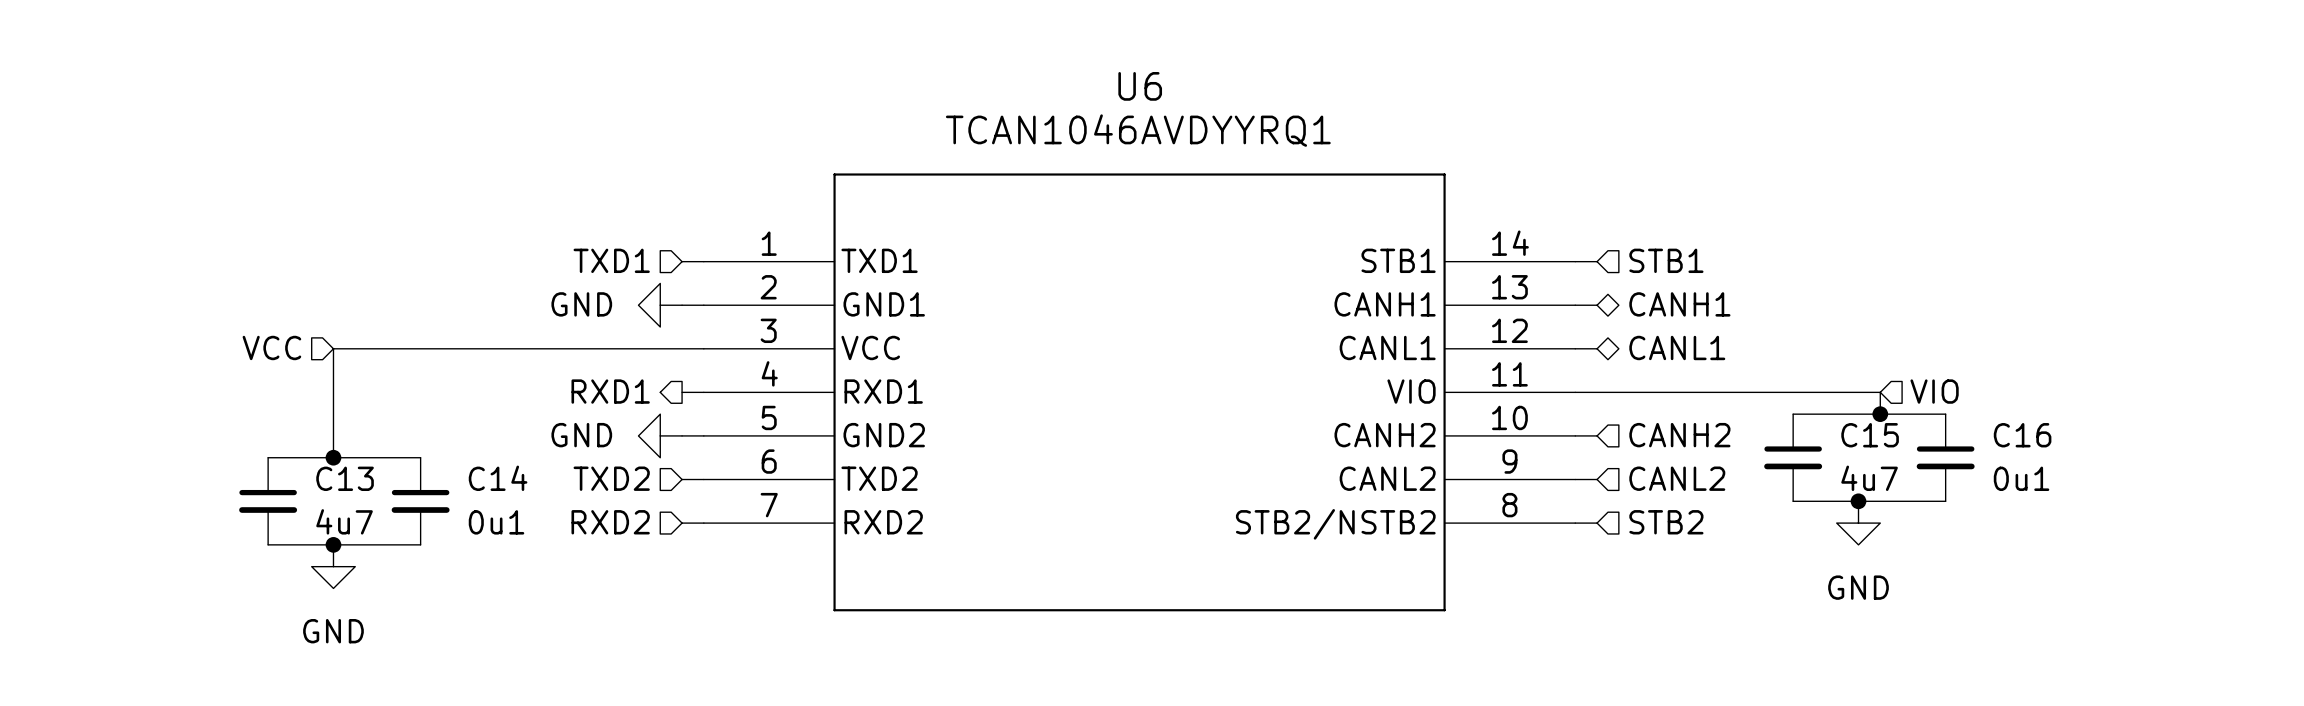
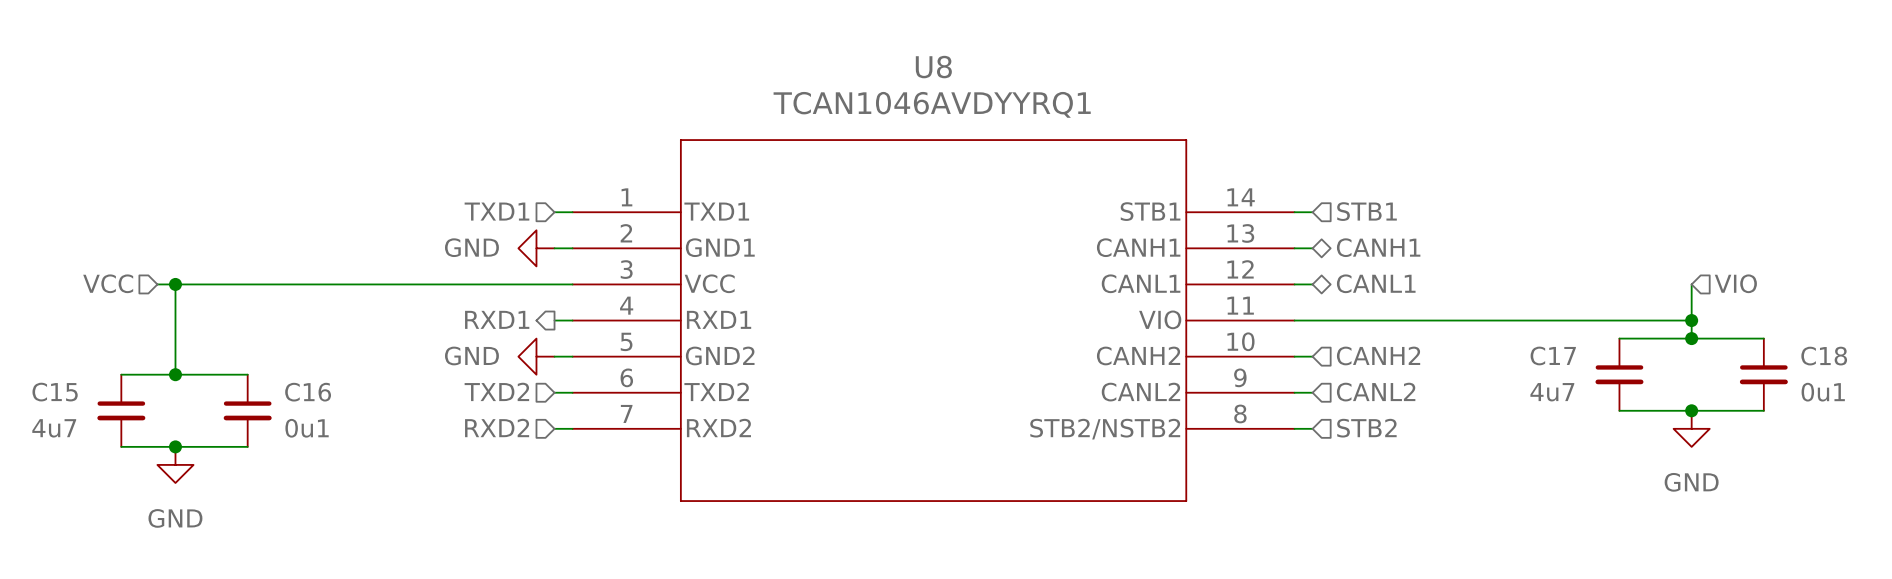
U6 name: U6 (1140, 86) -> U8 (933, 67)
hierarchical label position: VCC (271, 347) -> VCC (108, 283)
wire: none -> (175, 284) (175, 374)
junction: none -> (175, 284)
wire: (333, 348) (333, 457) -> (265, 284) (157, 284)
wire: none -> (1691, 284) (1691, 338)
hierarchical label position: VIO (1934, 391) -> VIO (1735, 283)
wire: (1880, 392) (1880, 414) -> (1547, 320) (1691, 320)
junction: none -> (1691, 320)
wire: (1793, 414) (1945, 414) -> none
junction: (1880, 414) -> none
wire: none -> (1619, 338) (1763, 338)
junction: none -> (1691, 338)
C15 name position: C15 (1870, 435) -> C15 (55, 392)
junction: none -> (175, 374)
wire: (311, 457) (420, 457) -> (121, 374) (211, 374)
junction: (333, 457) -> none
C15 position: (1793, 457) -> (121, 410)
C16 position: (1945, 457) -> (247, 410)
C17: none -> 4u7 (1619, 374)
C18: none -> 0u1 (1763, 374)
C15 value position: 4u7 (1869, 478) -> 4u7 (54, 428)
C13: 4u7 (268, 501) -> none
C14: 0u1 (420, 501) -> none
wire: (1793, 501) (1945, 501) -> none
junction: (1858, 501) -> none
wire: none -> (1619, 410) (1763, 410)
junction: none -> (1691, 410)
power symbol position: GND (1858, 523) -> GND (1691, 428)
junction: none -> (175, 446)
wire: (311, 544) (420, 544) -> (121, 446) (211, 446)
junction: (333, 544) -> none
power symbol position: GND (333, 566) -> GND (175, 464)

